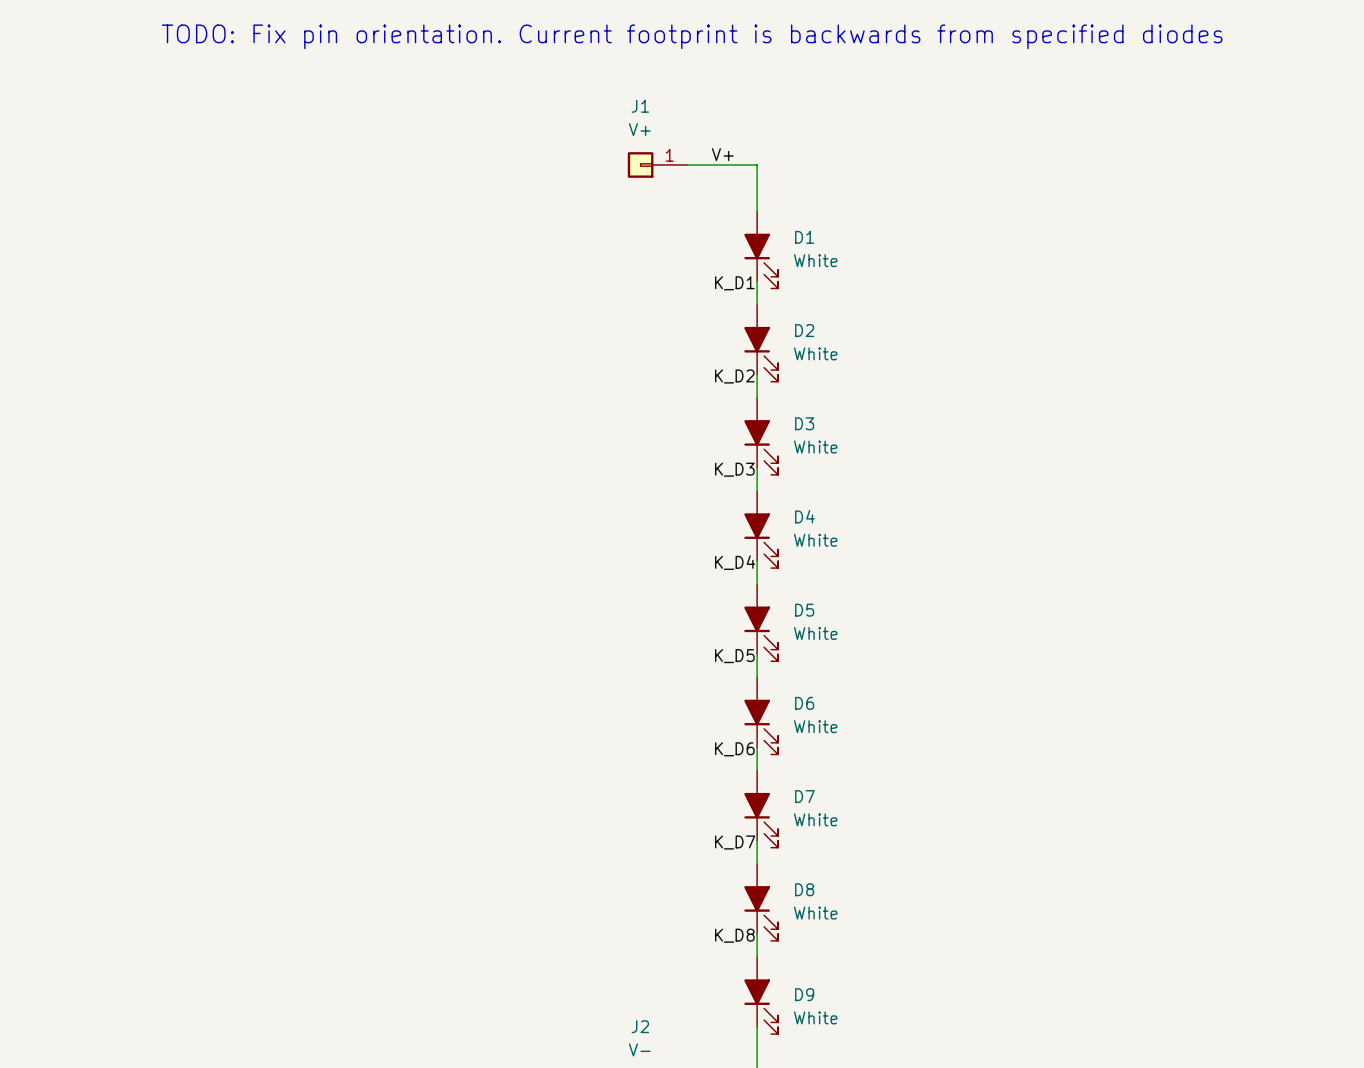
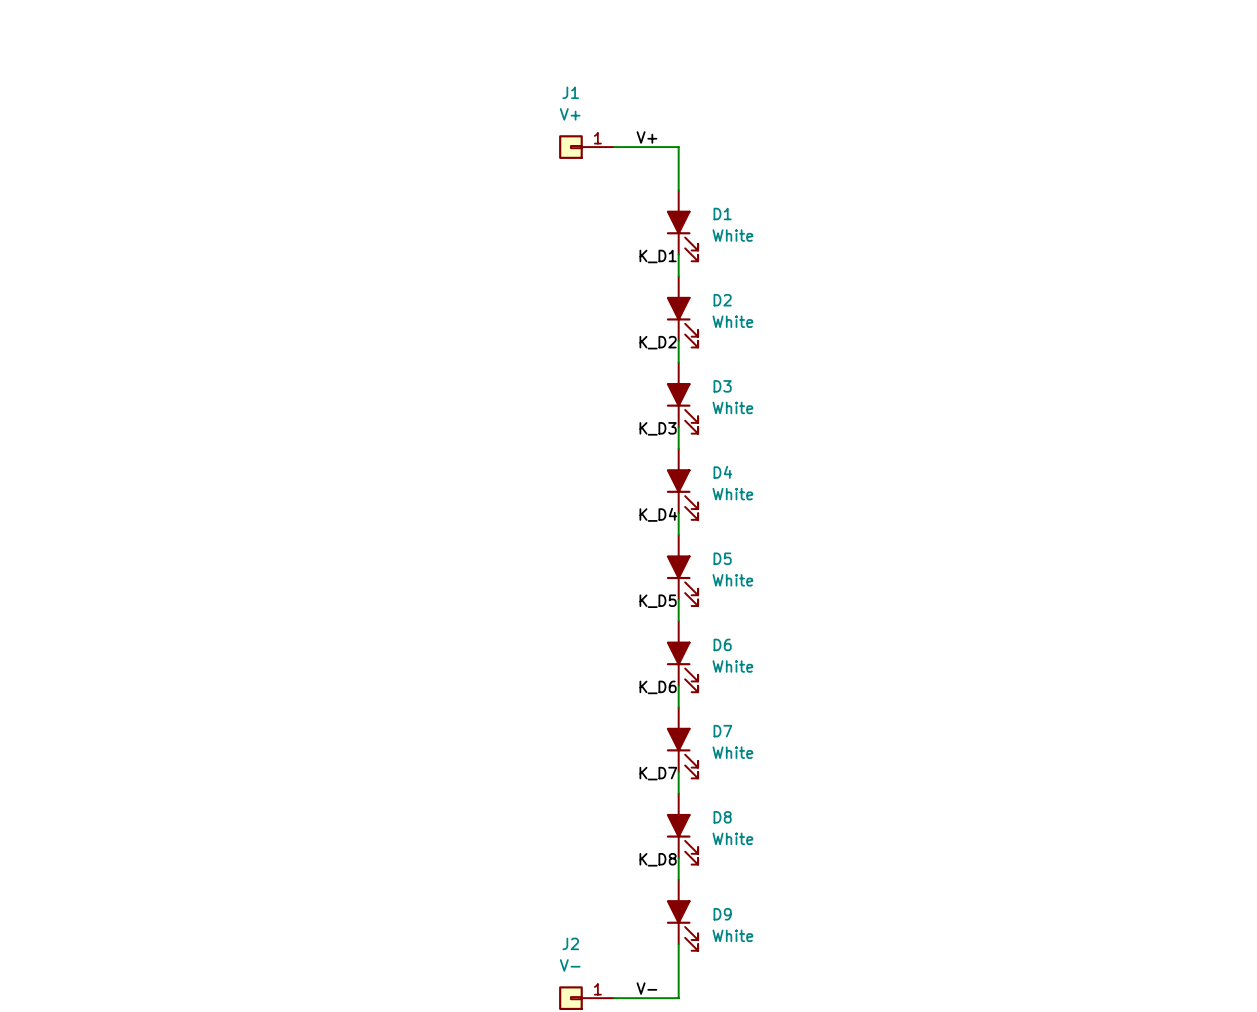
text: TODO: Fix pin orientation. Current footprint is backwards from specified diodes (692, 36) -> none

